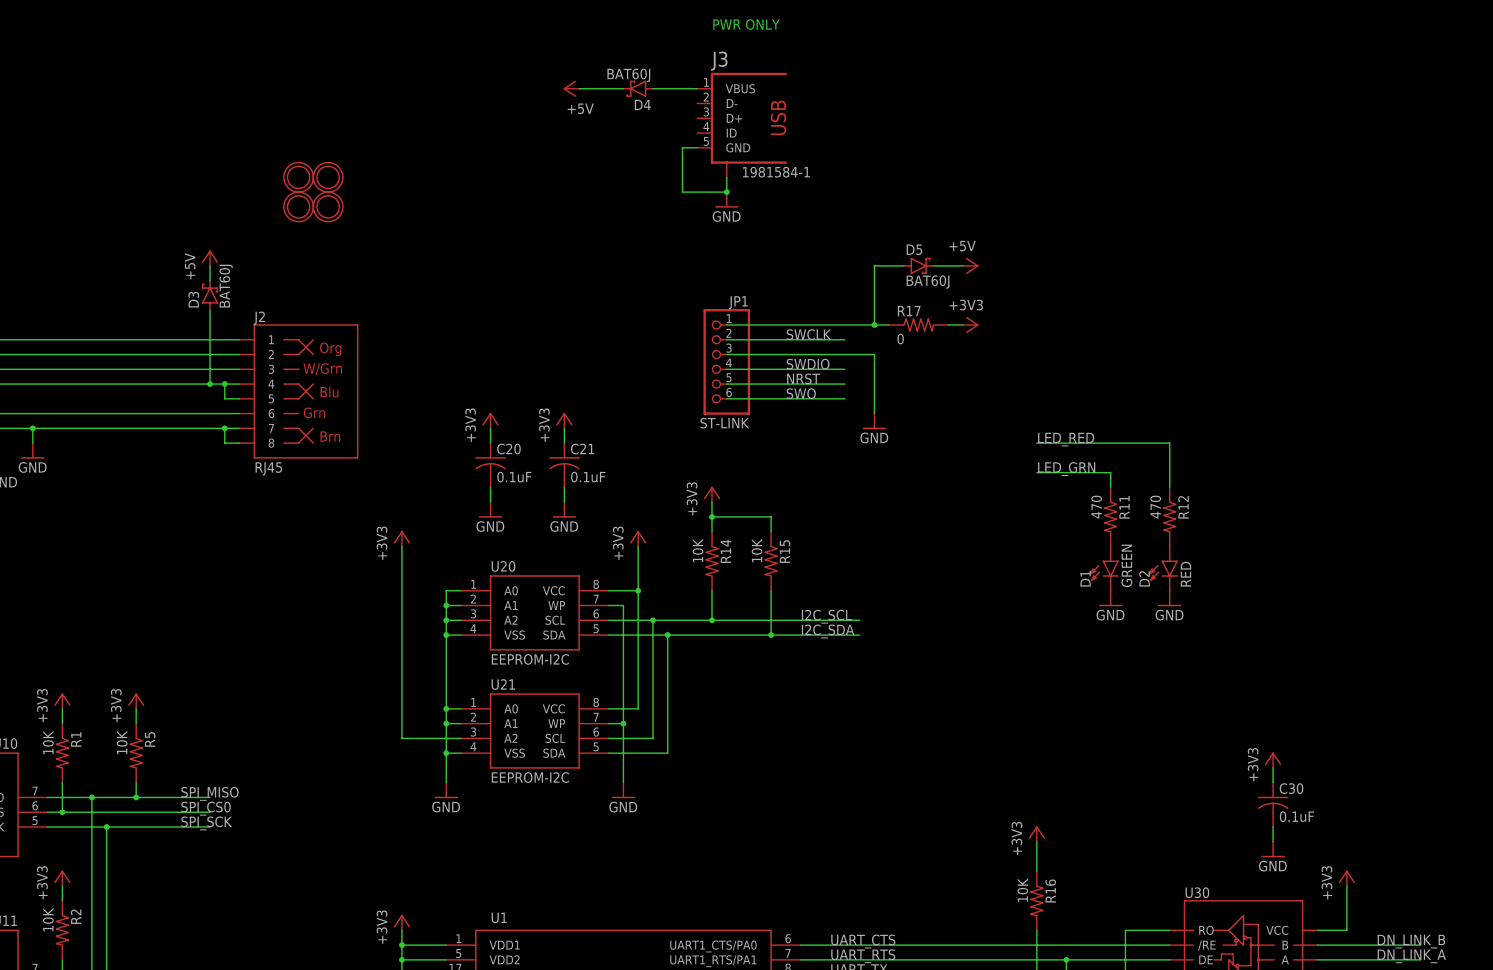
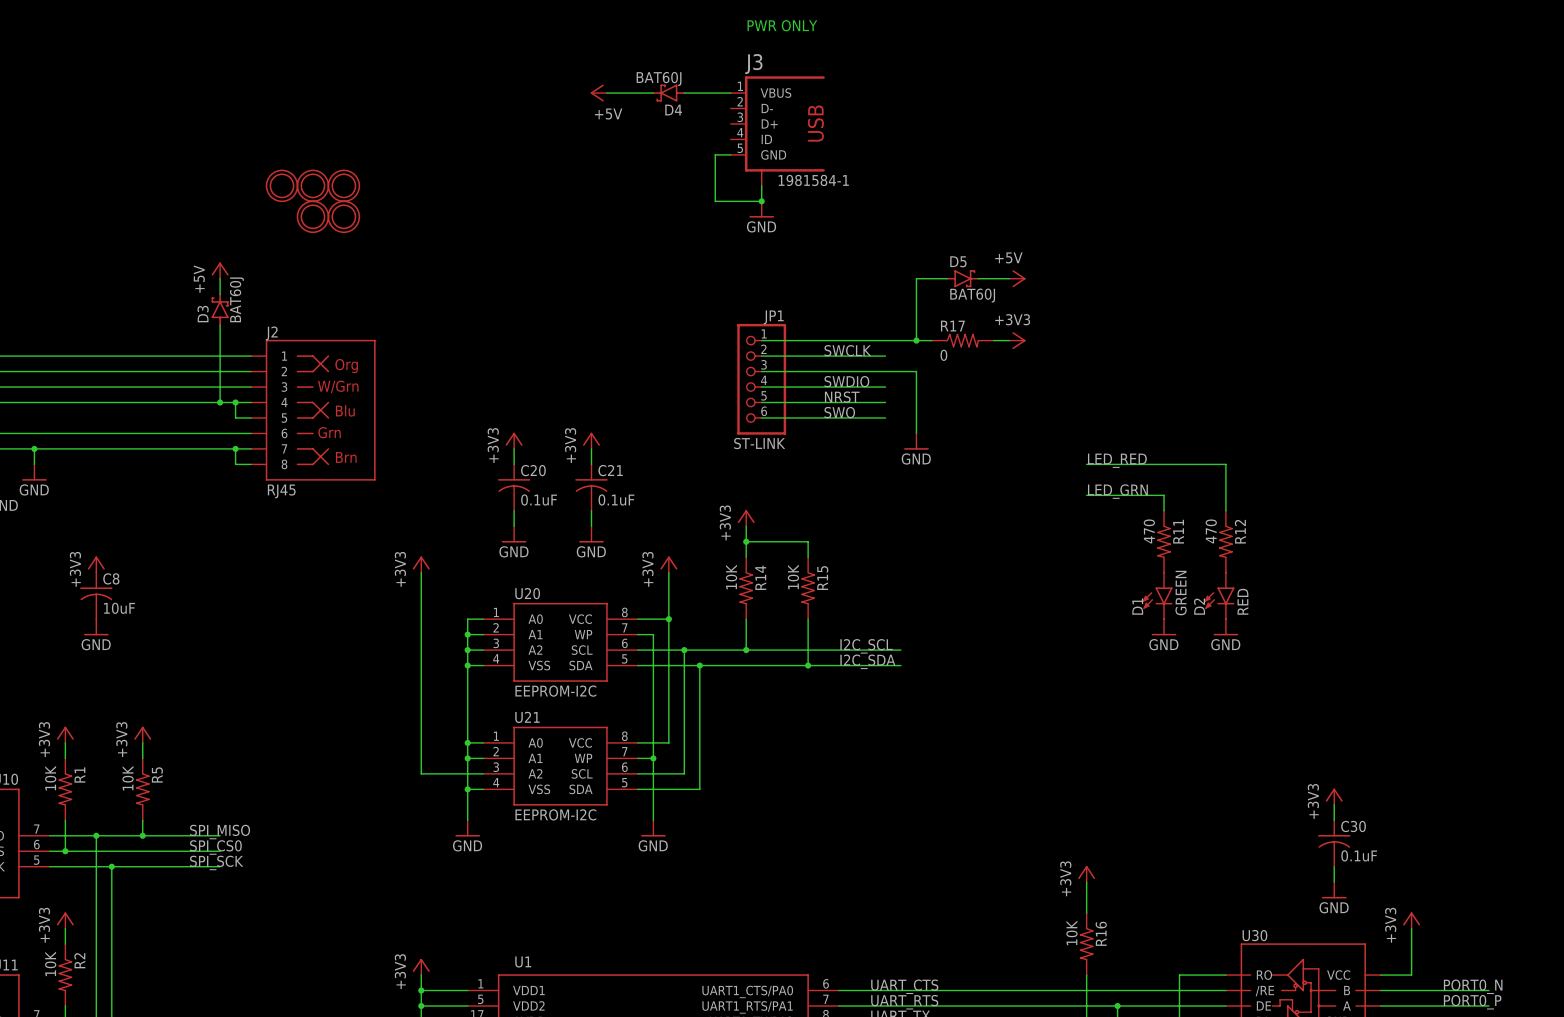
part: none -> (282, 185)
power symbol: none -> +3V3 (96, 564)
C8: none -> 10uF (96, 595)
power symbol: none -> GND (96, 627)
label: DN_LINK_B (1411, 941) -> PORT0_N (1473, 986)
label: DN_LINK_A (1411, 956) -> PORT0_P (1472, 1002)

